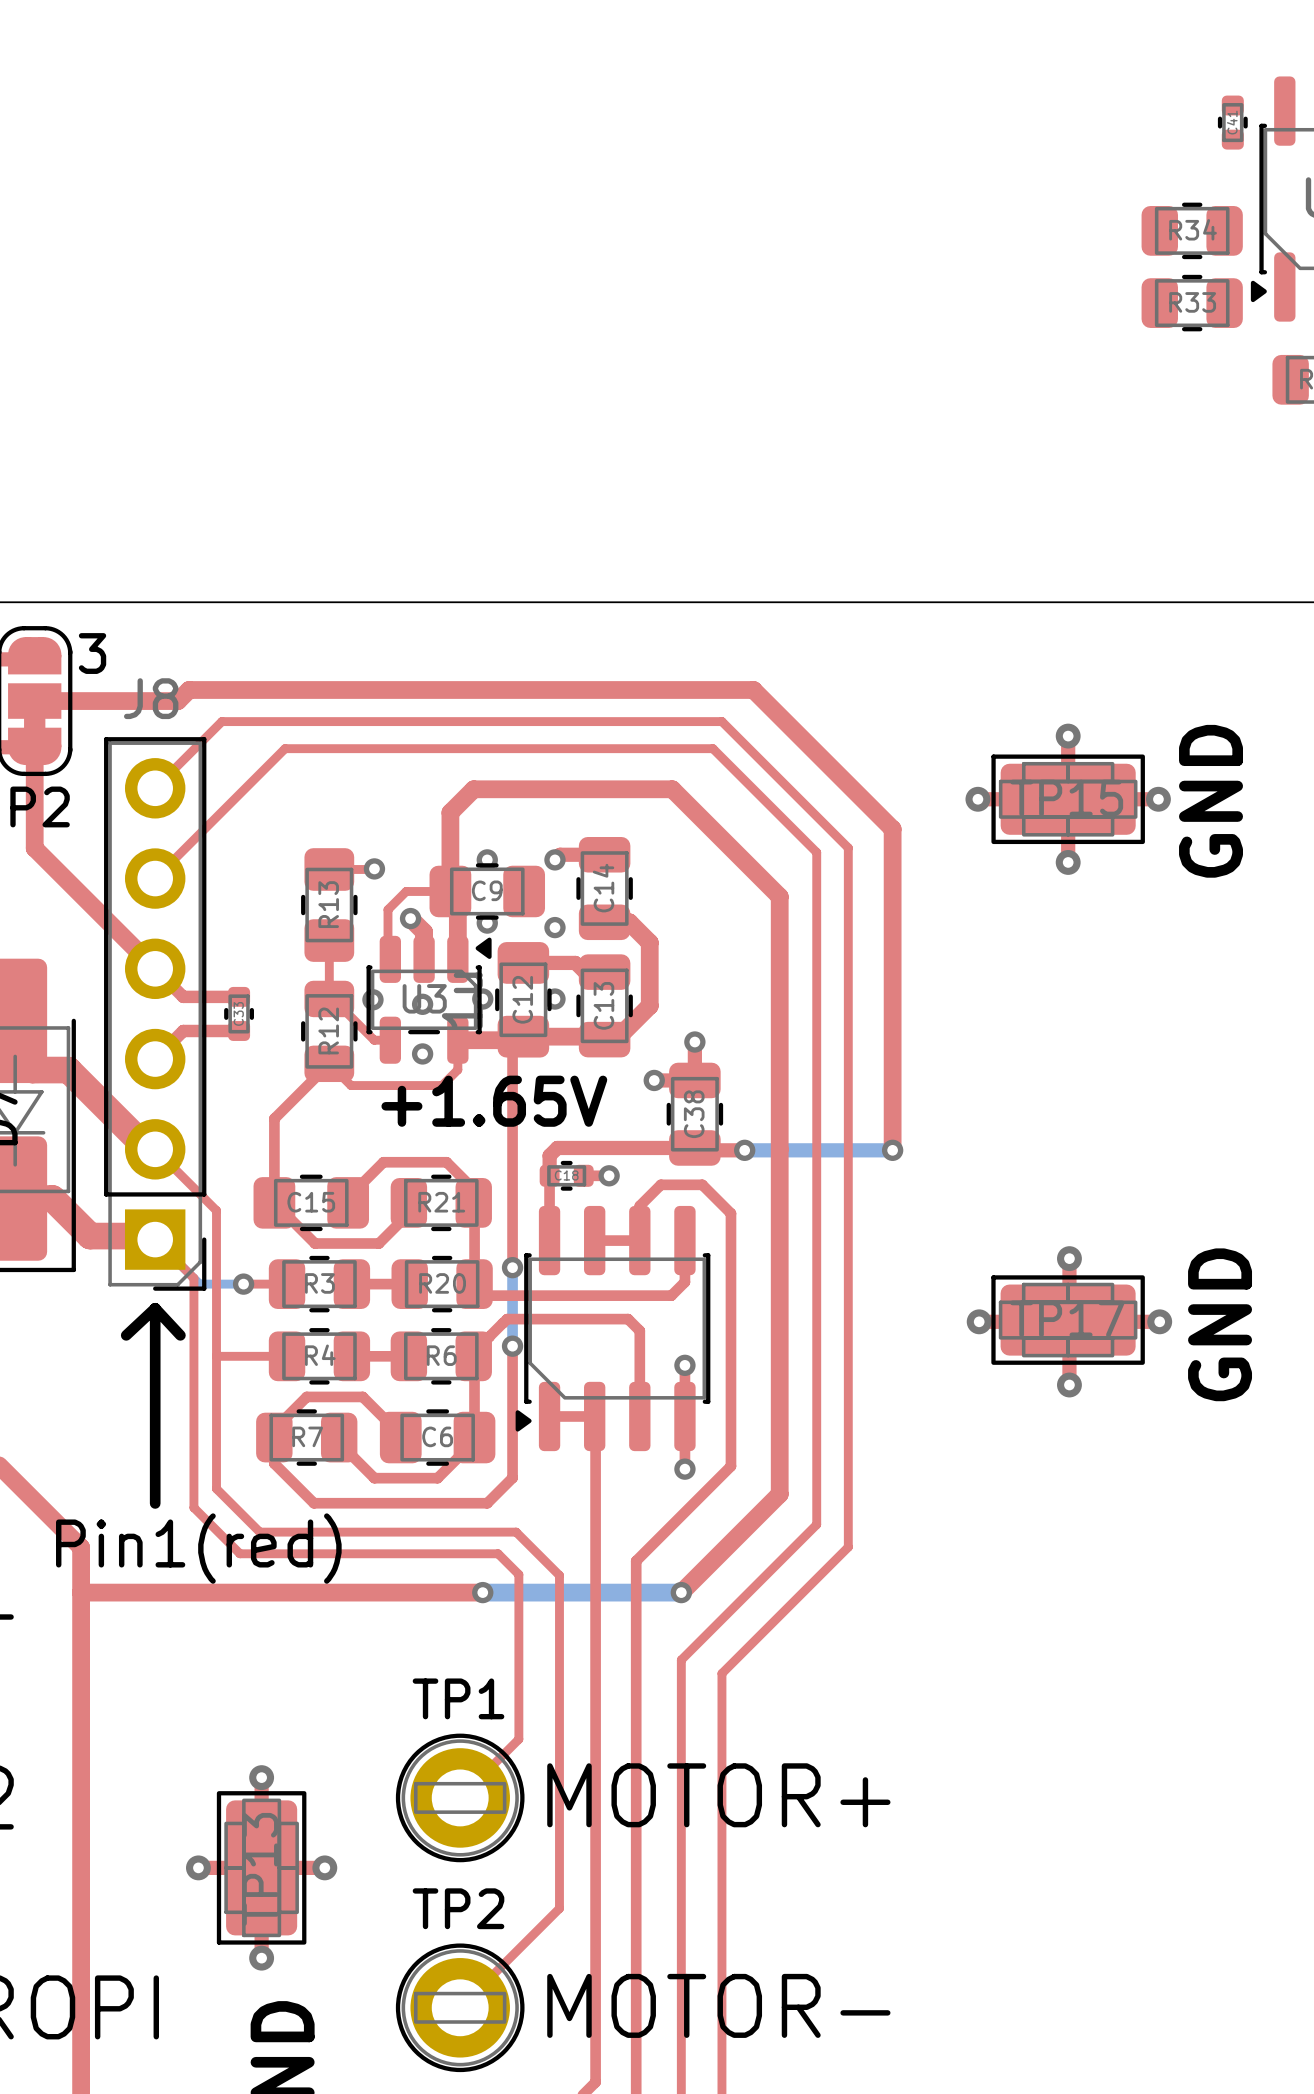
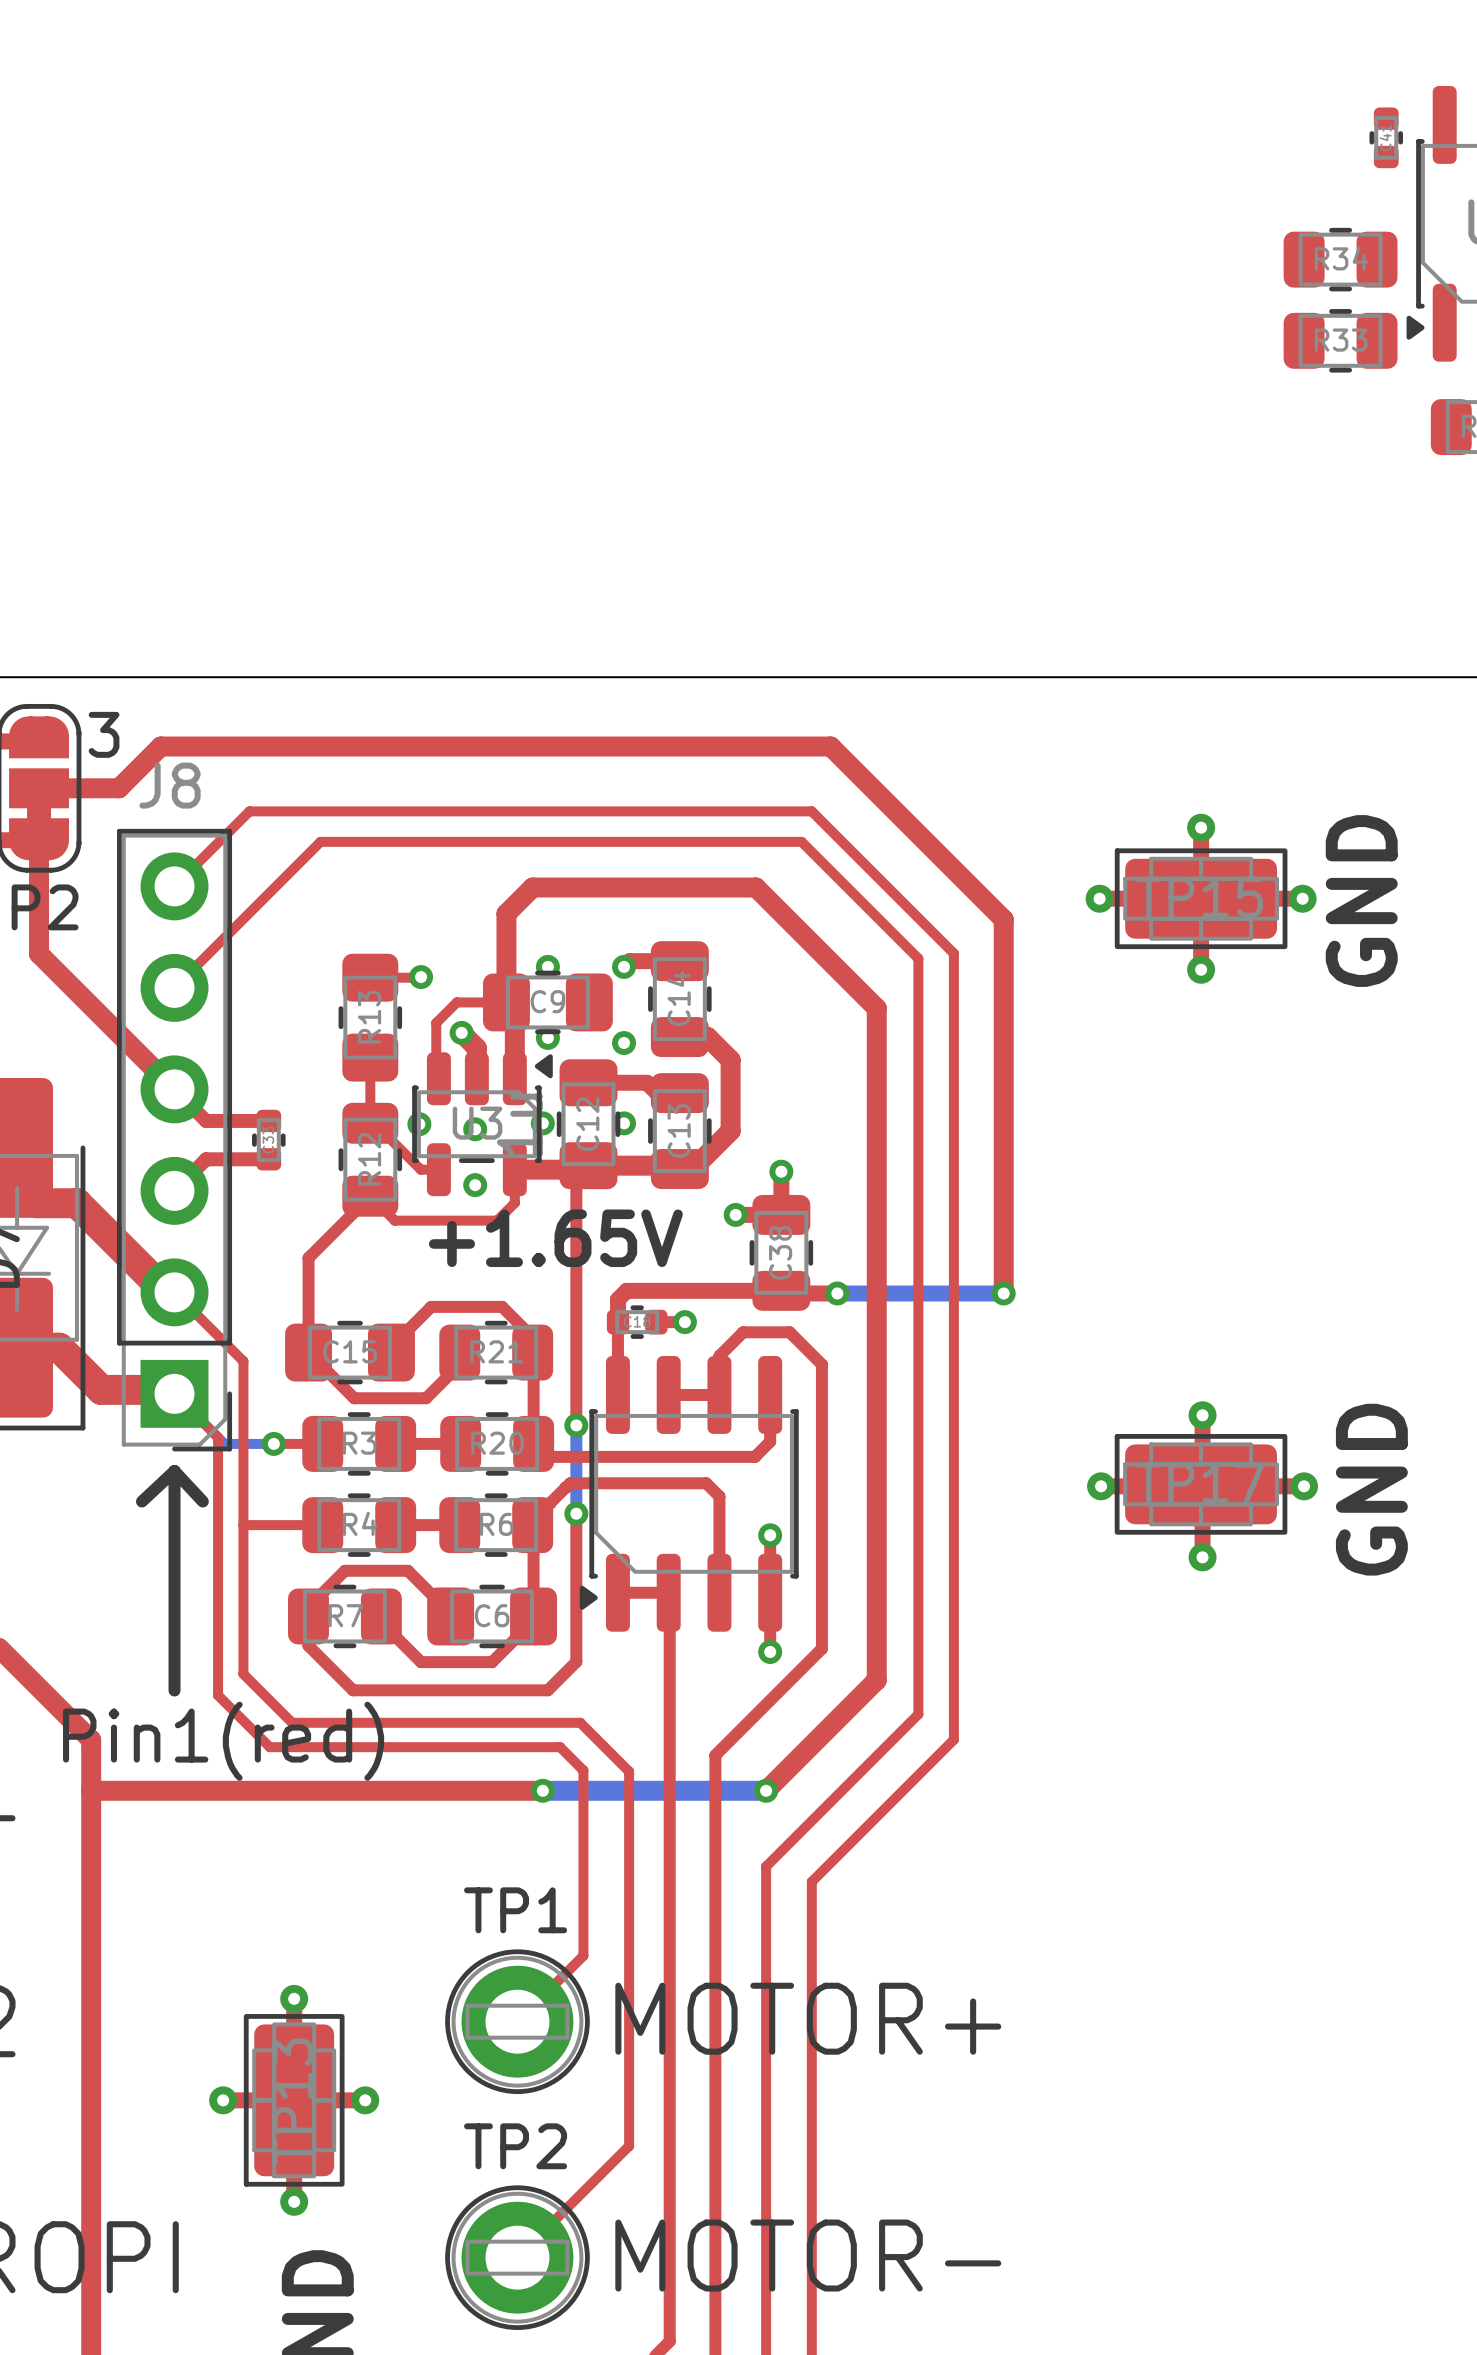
top track: (105, 701) (178, 701) (189, 690) (753, 690) (892, 829) -> (119, 788) (160, 746) (830, 746) (1003, 919) (1003, 932)

